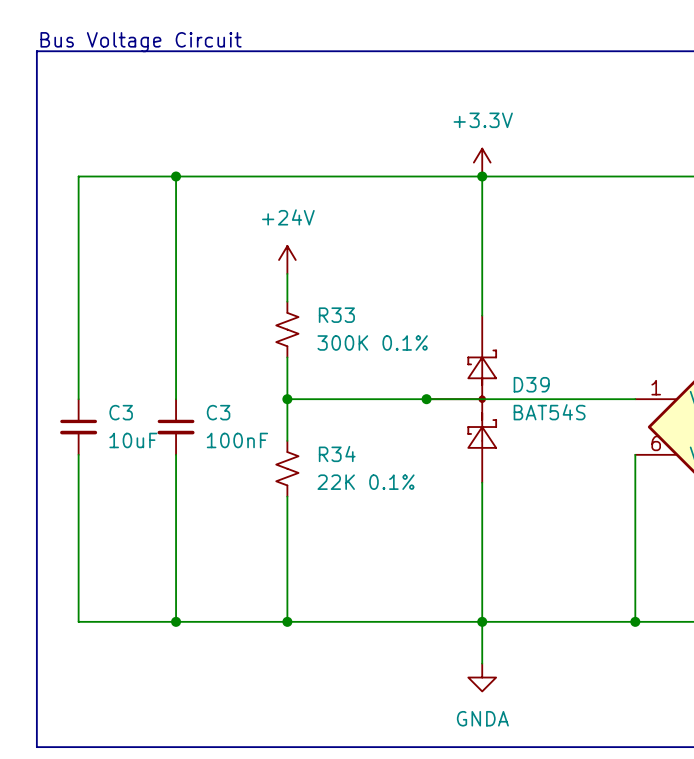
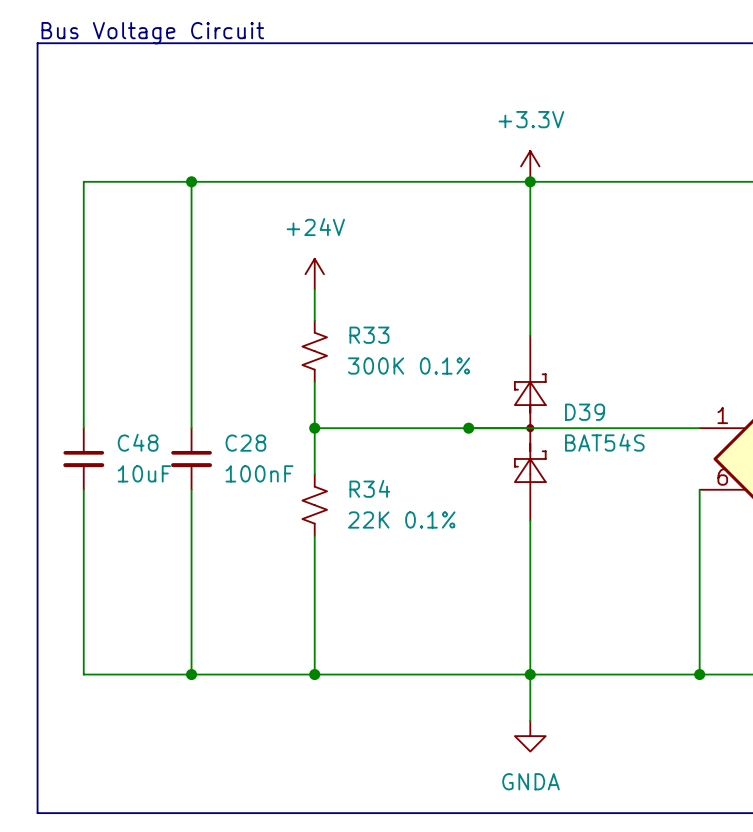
C3 name: C3 (121, 412) -> C48 (138, 442)
C3 name: C3 (218, 412) -> C28 (245, 443)

